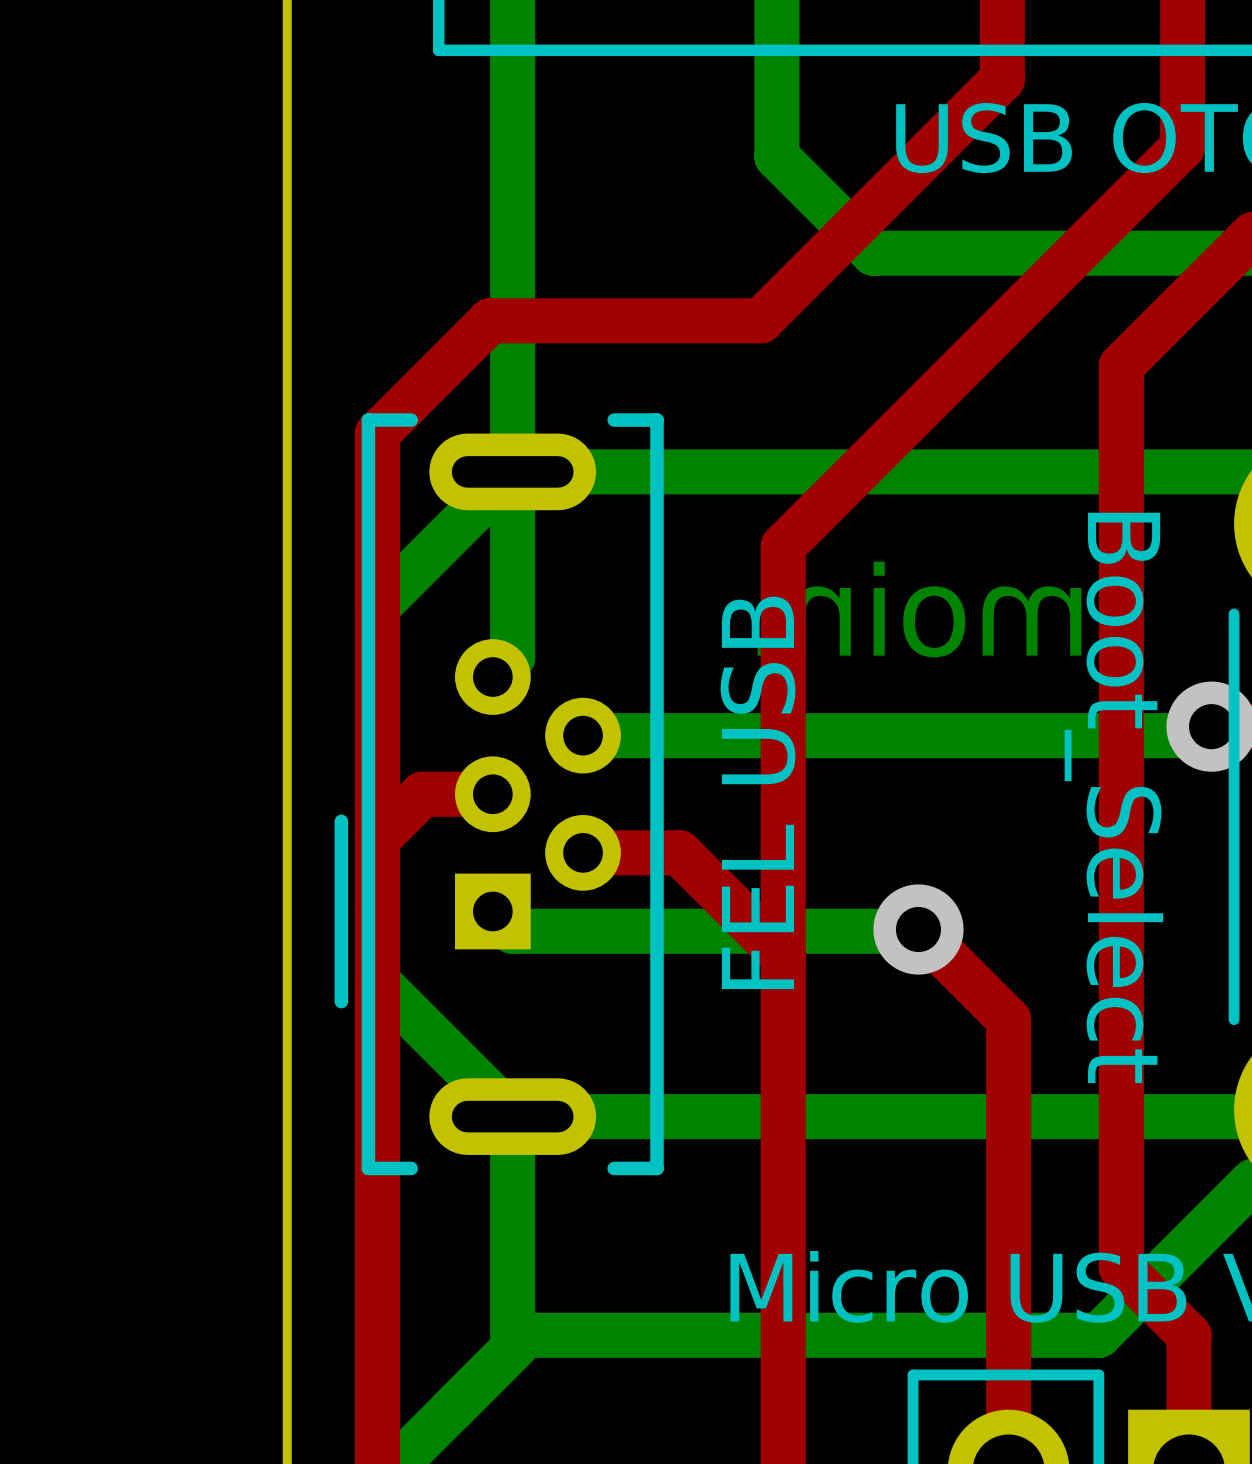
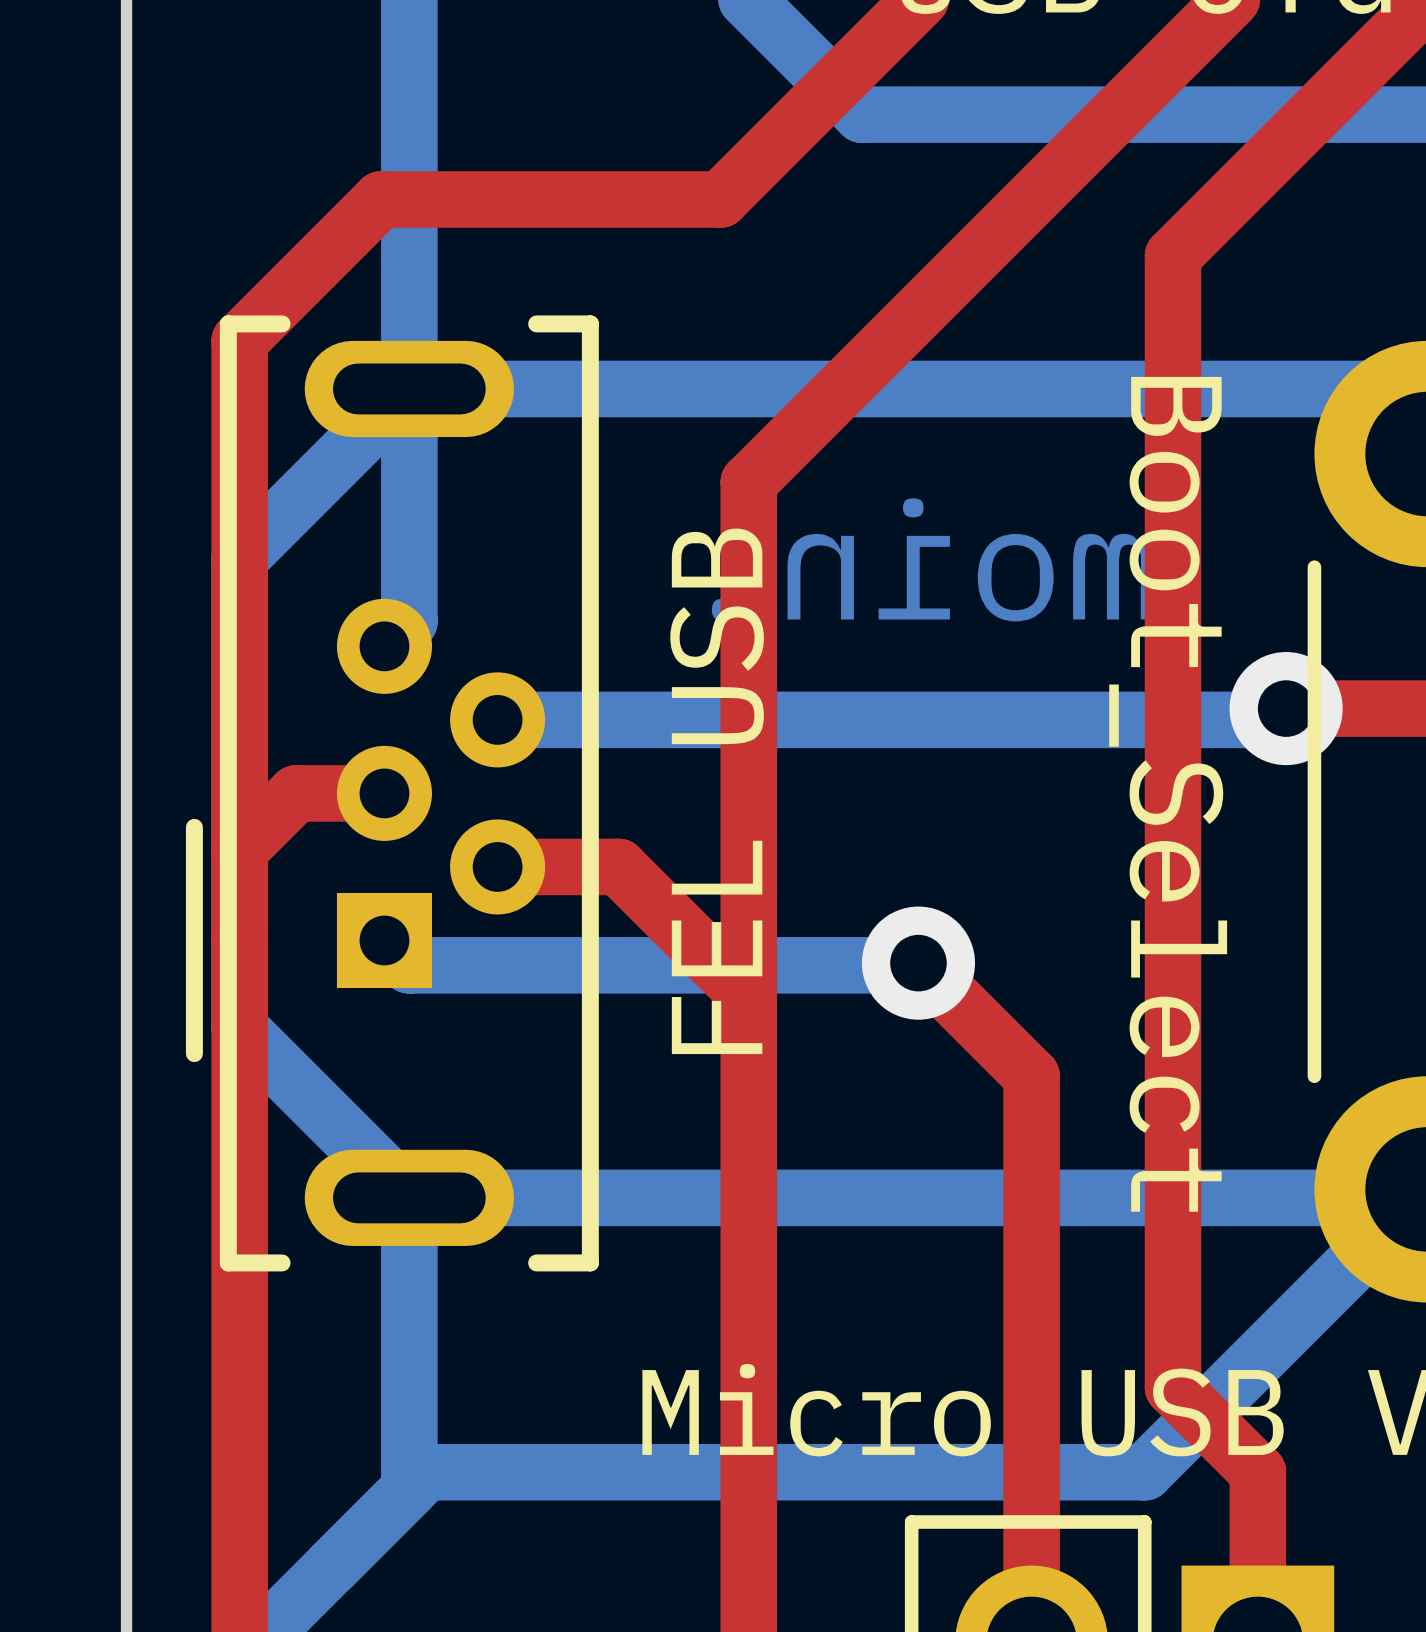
part footprint: [334, 413, 664, 1176] -> [185, 315, 599, 1272]

